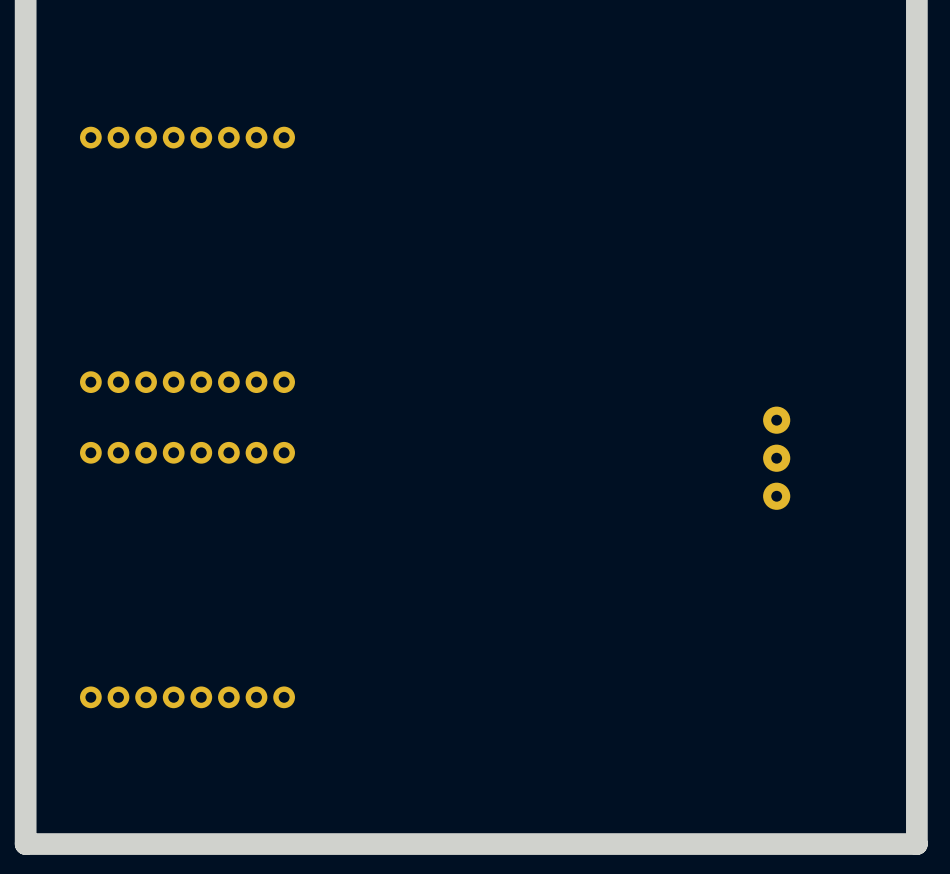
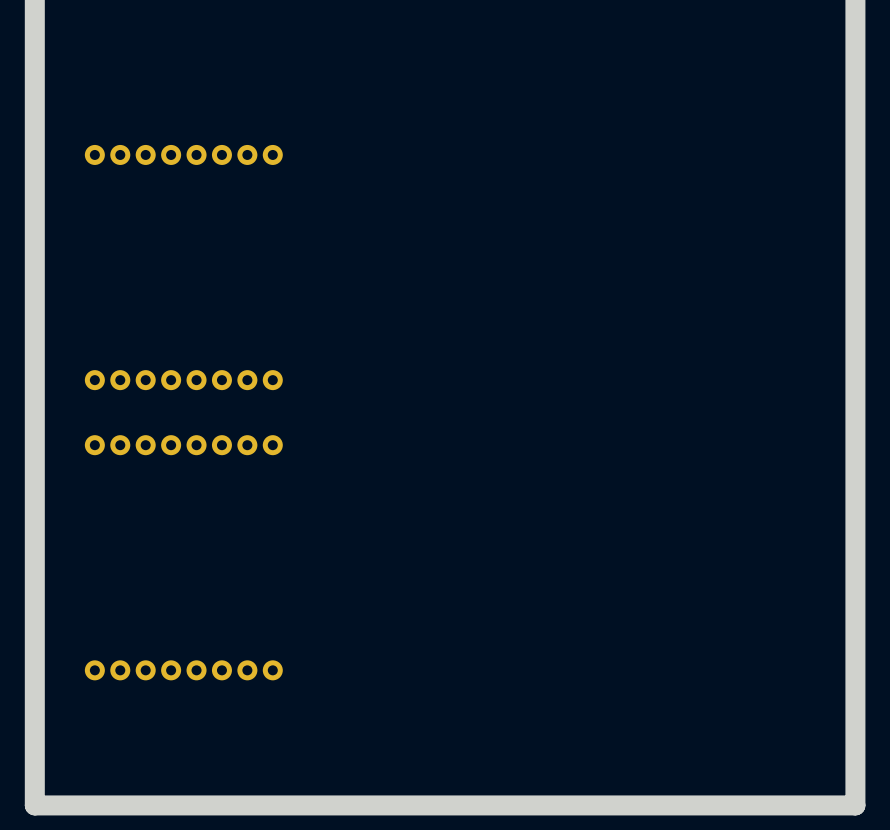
part: (776, 458) -> none

